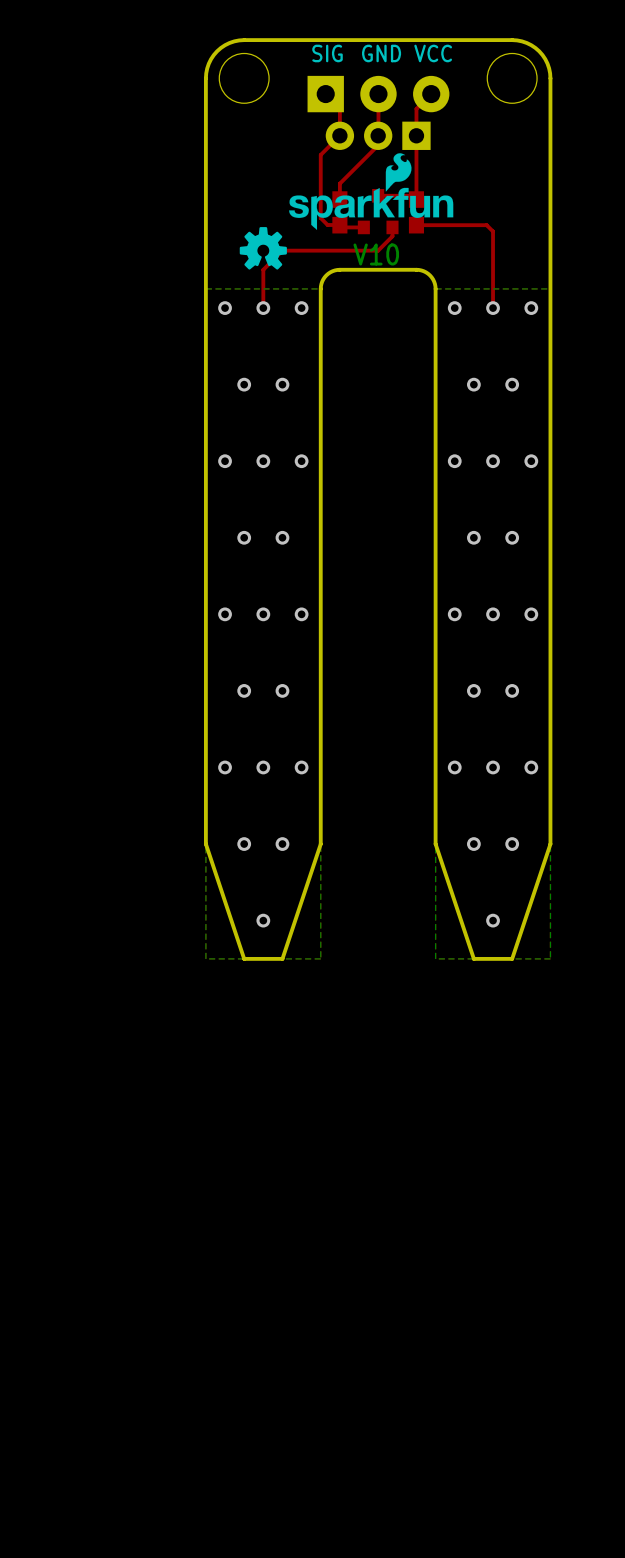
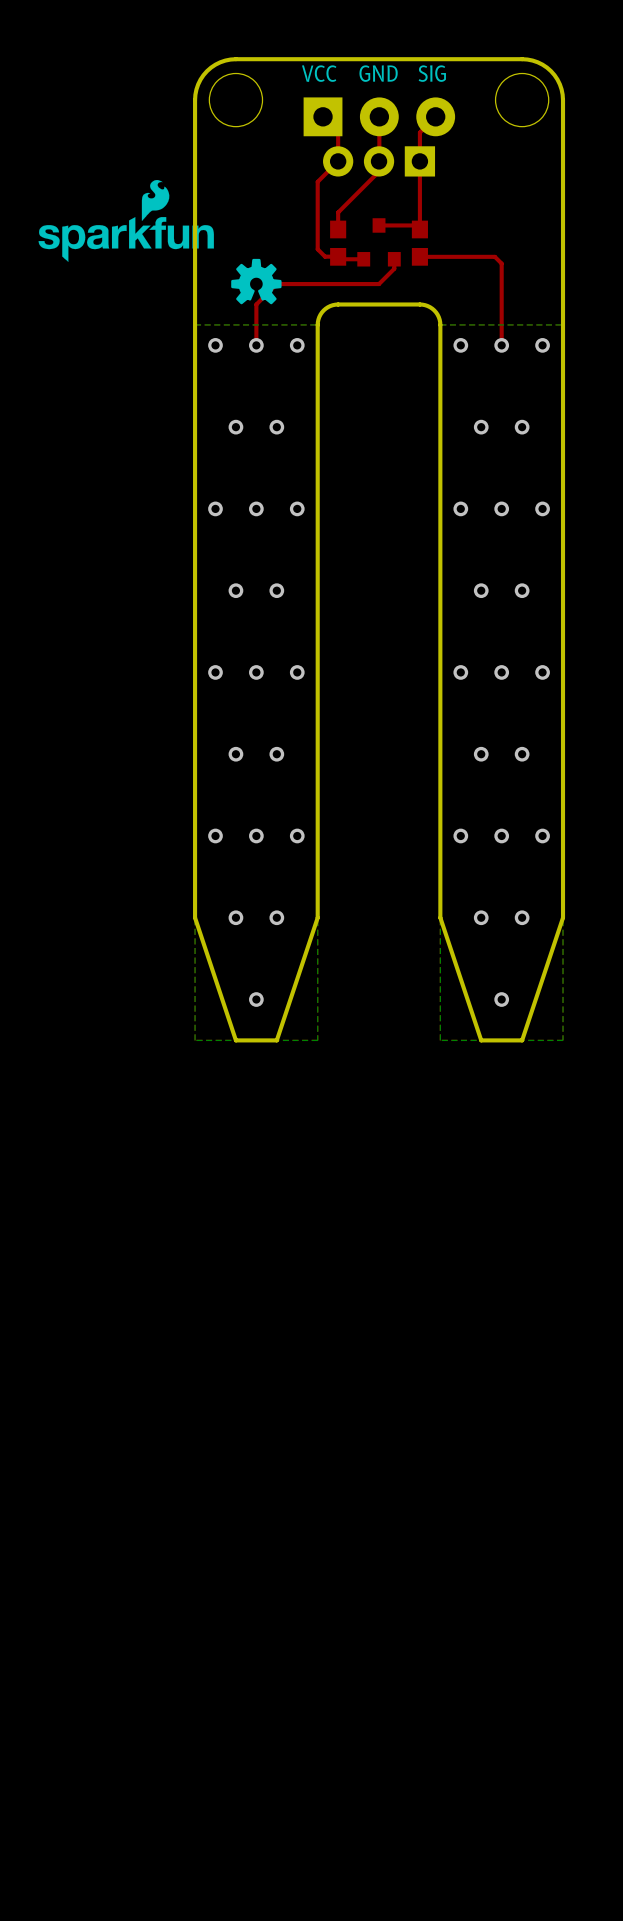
text: SIG (327, 53) -> VCC (319, 73)
text: VCC (433, 53) -> SIG (432, 73)
drawing position: (371, 191) -> (126, 221)
text: V10 (376, 254) -> none

